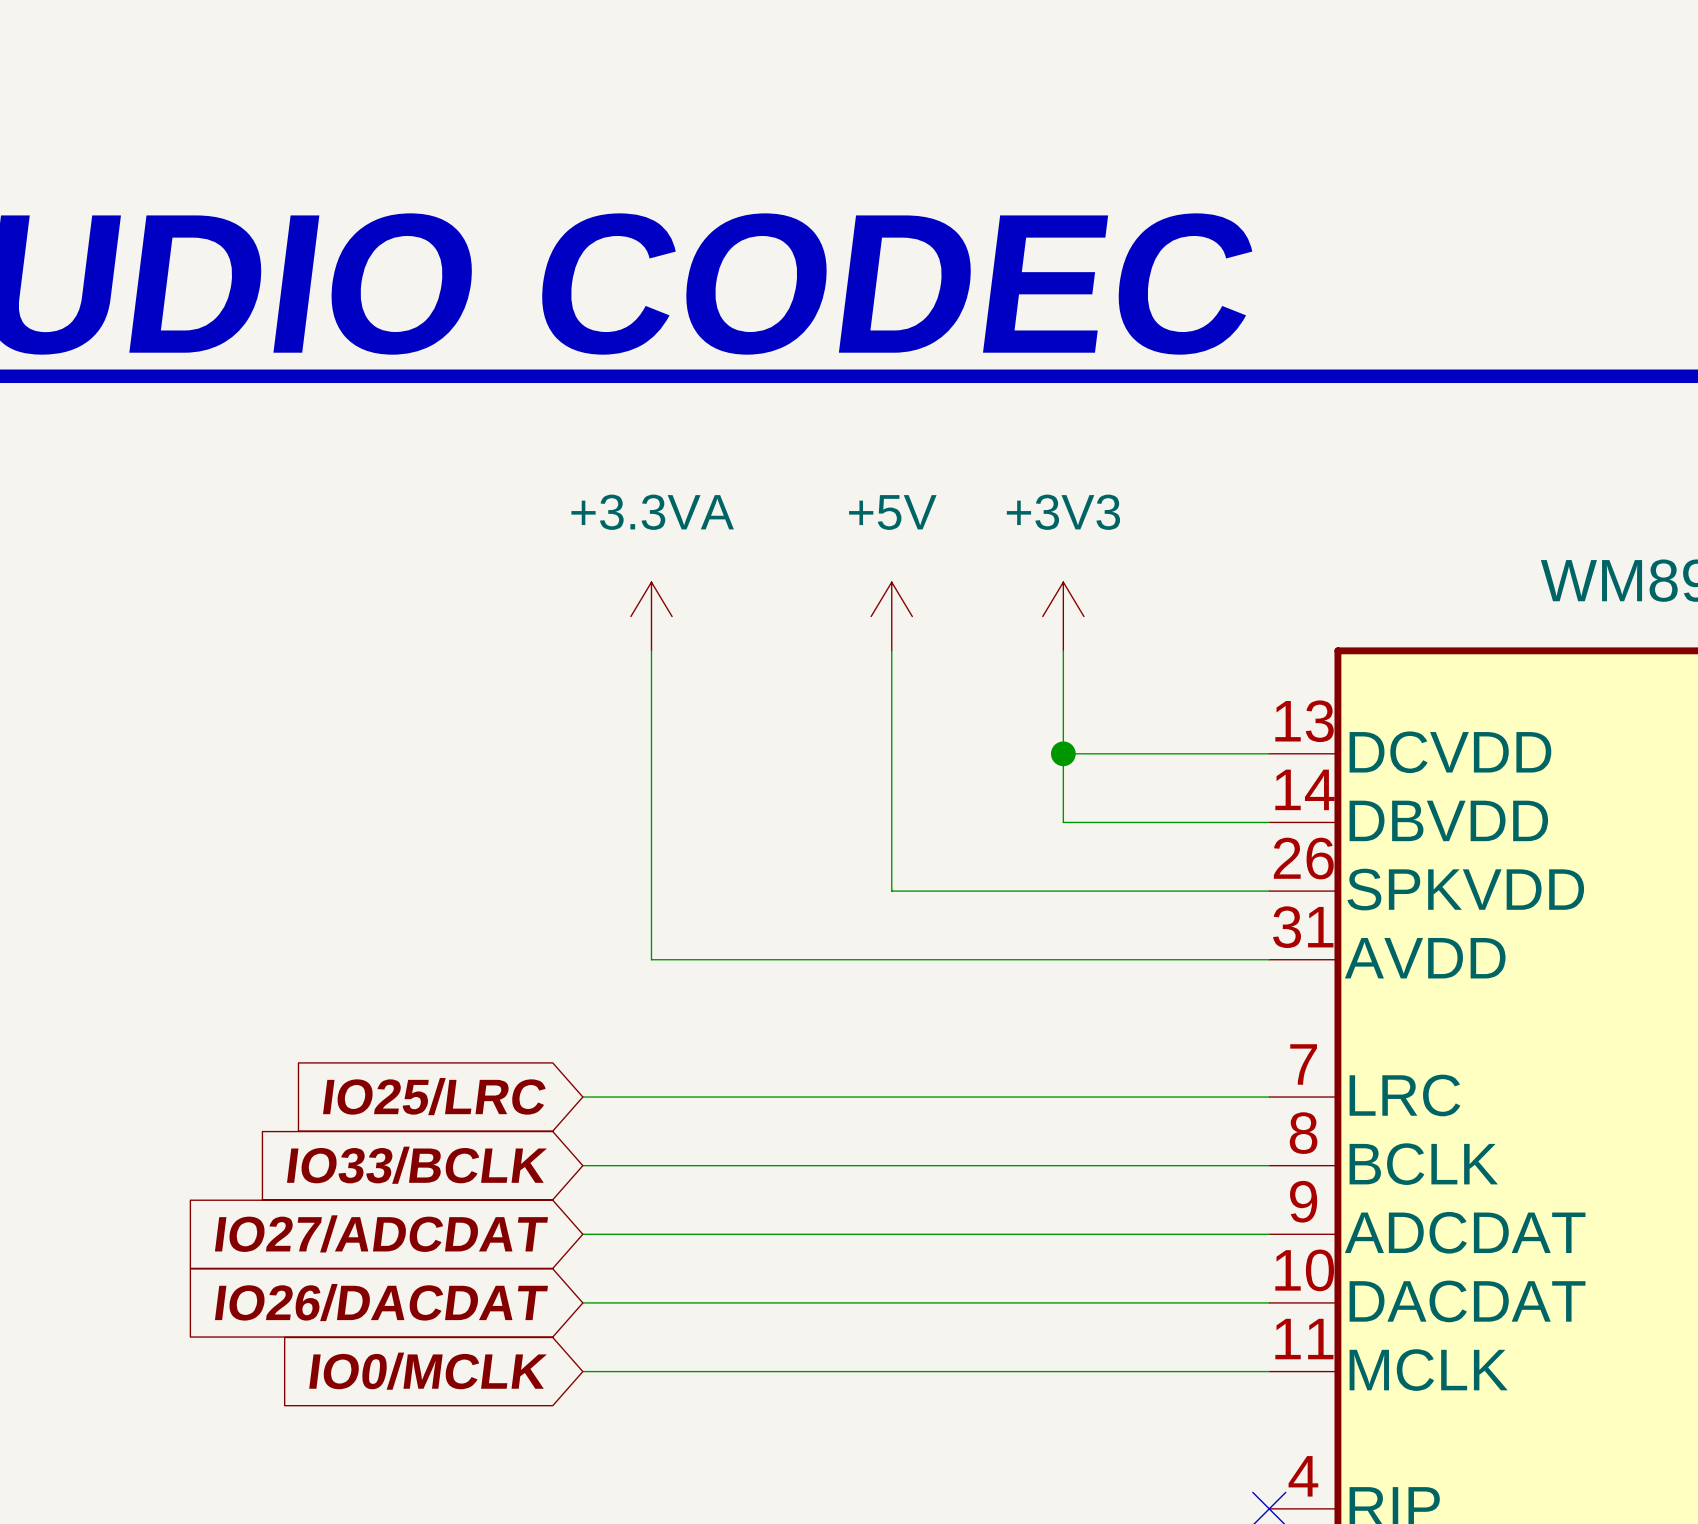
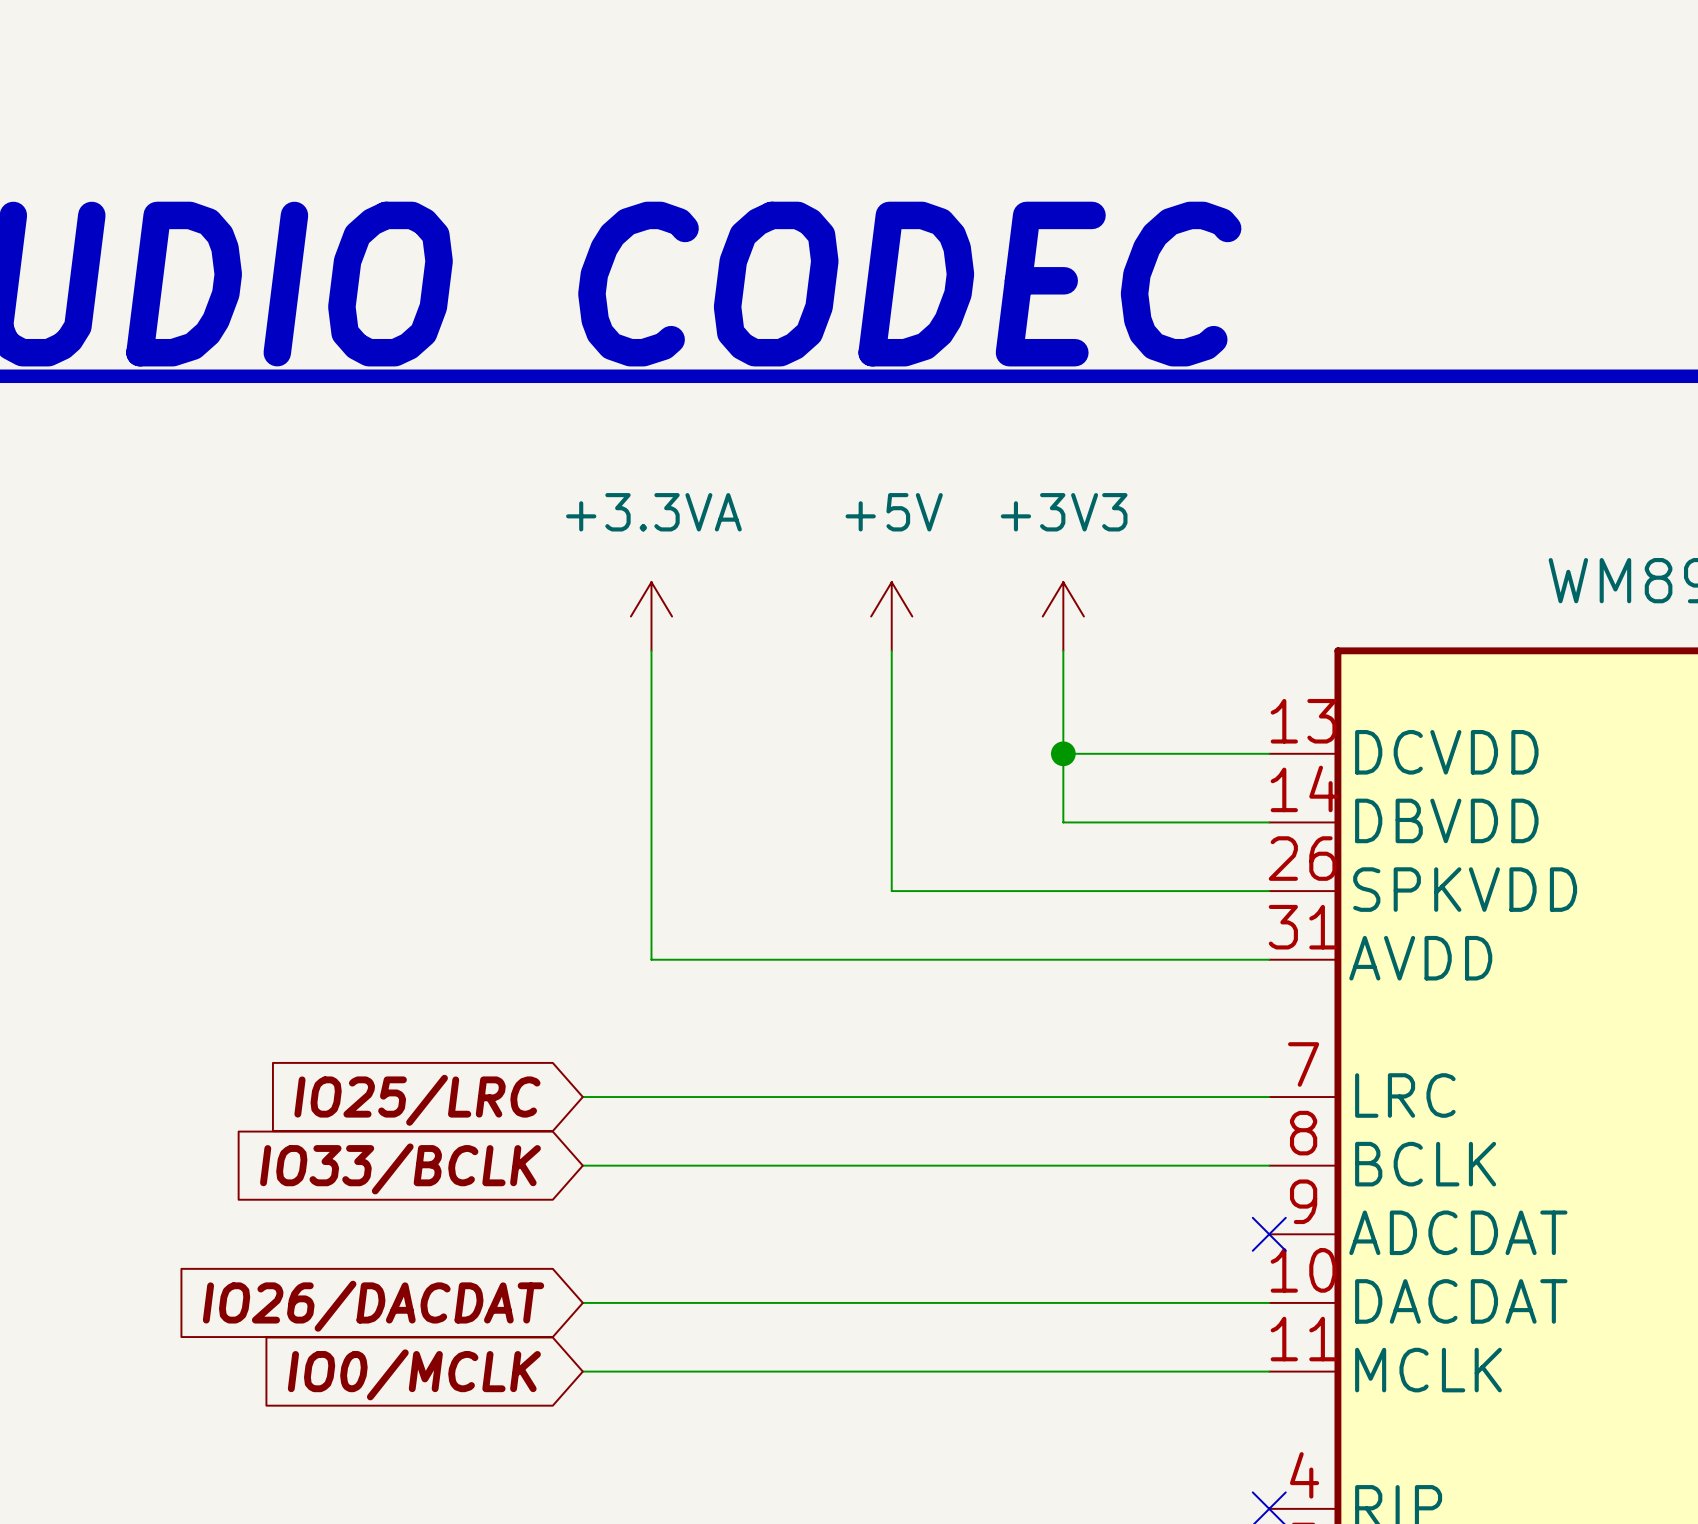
global label: IO27/ADCDAT (381, 1233) -> none
wire: (582, 1234) (1269, 1234) -> none
no-connect mark: none -> (1269, 1234)

